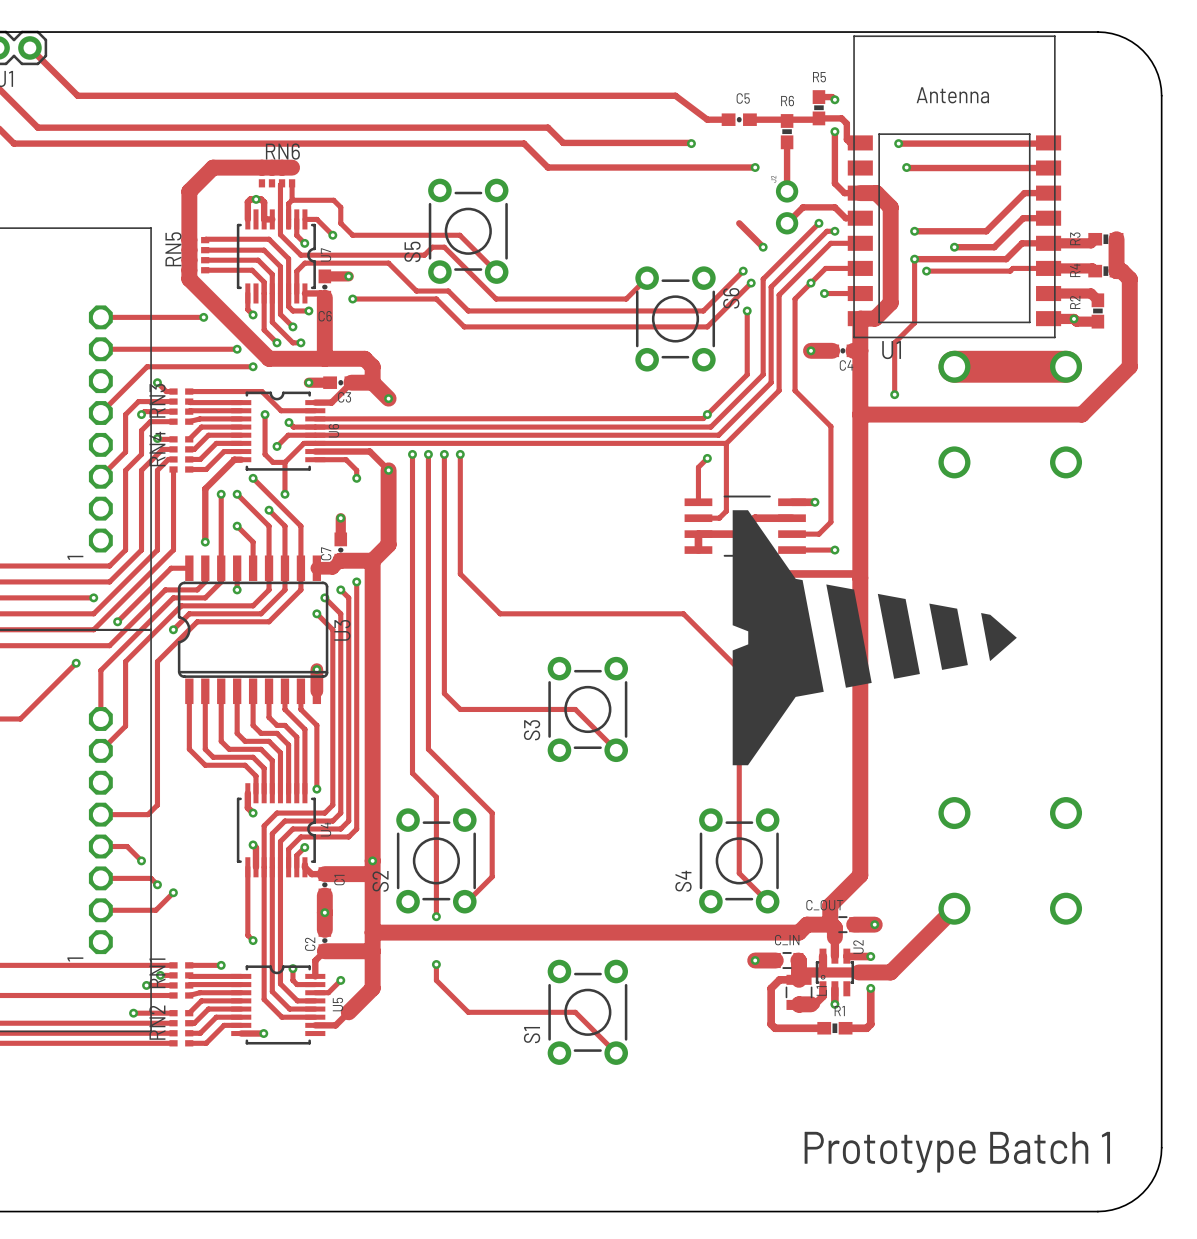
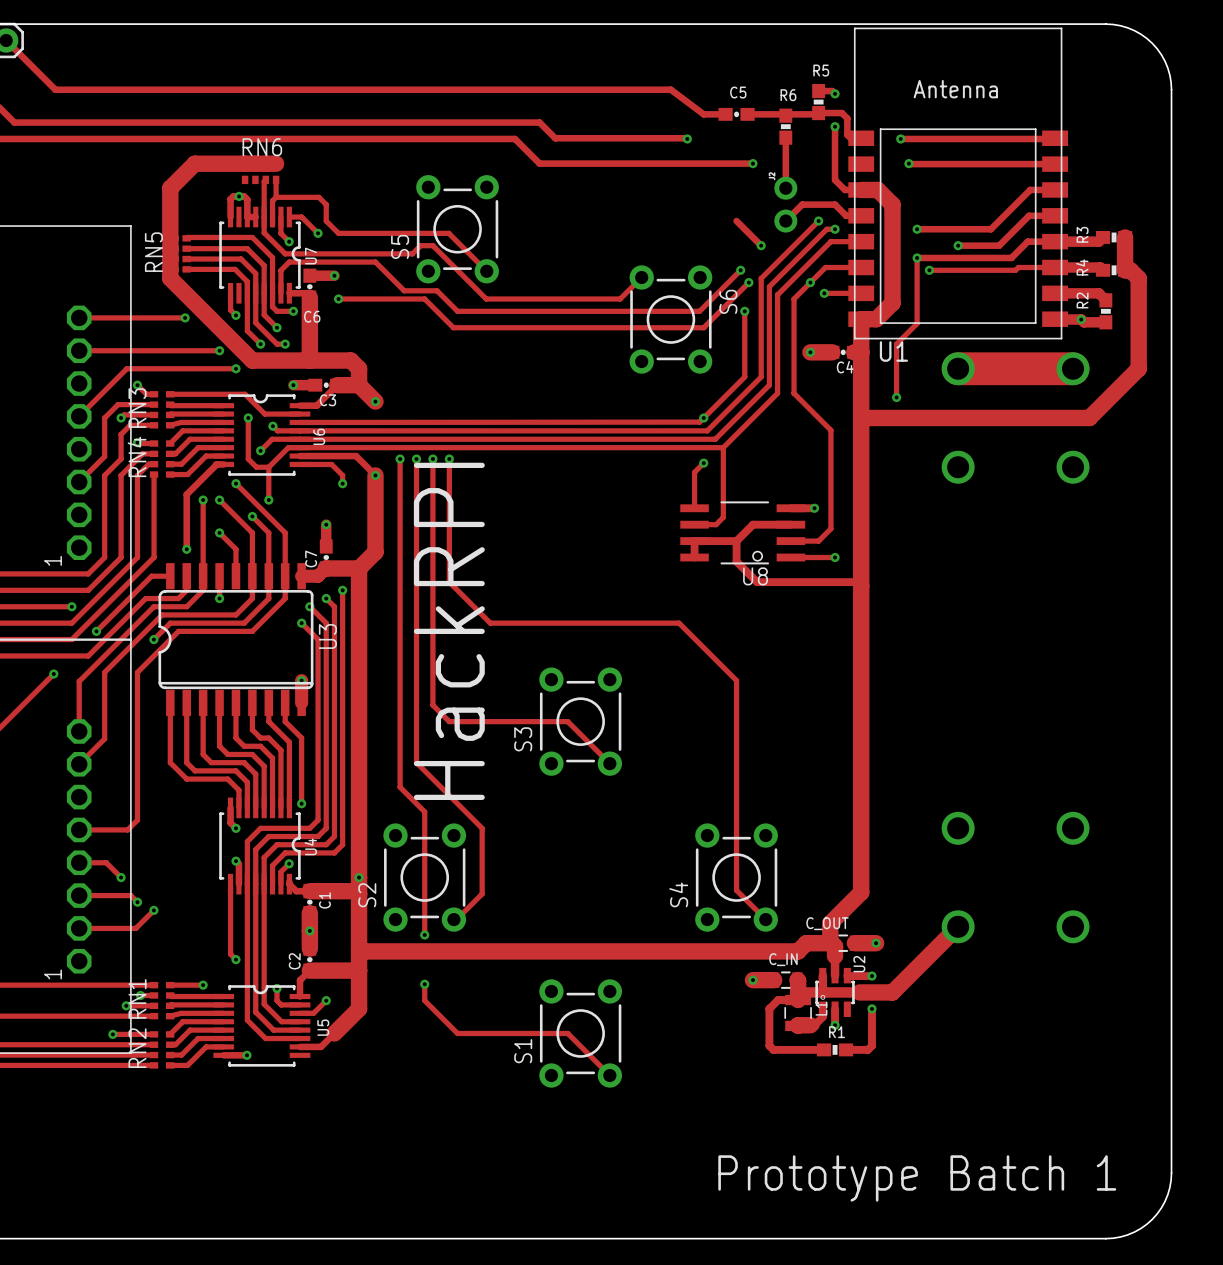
drawing: [732, 510, 1017, 766] -> none
text: none -> HackRPI (449, 631)

